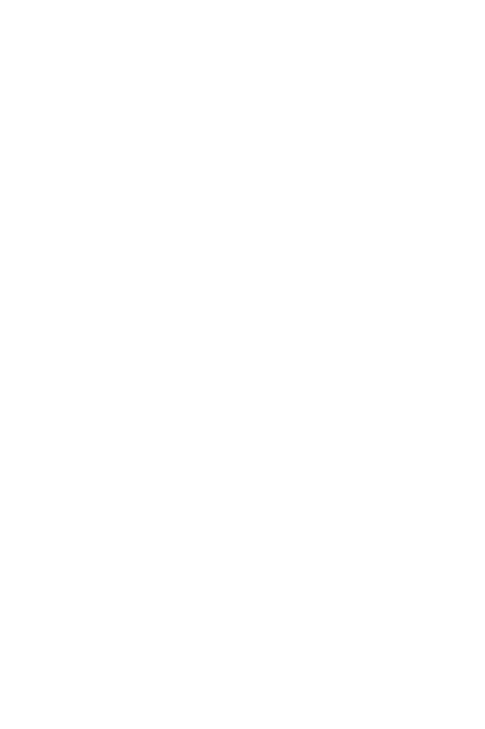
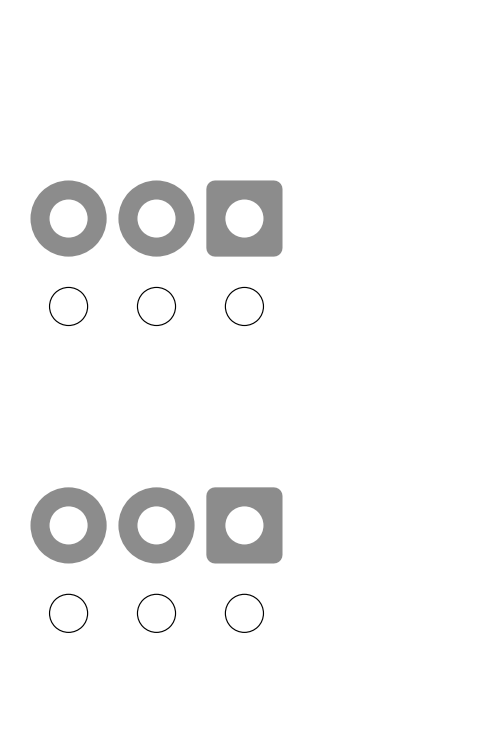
part: none -> (156, 252)
part: none -> (156, 559)

